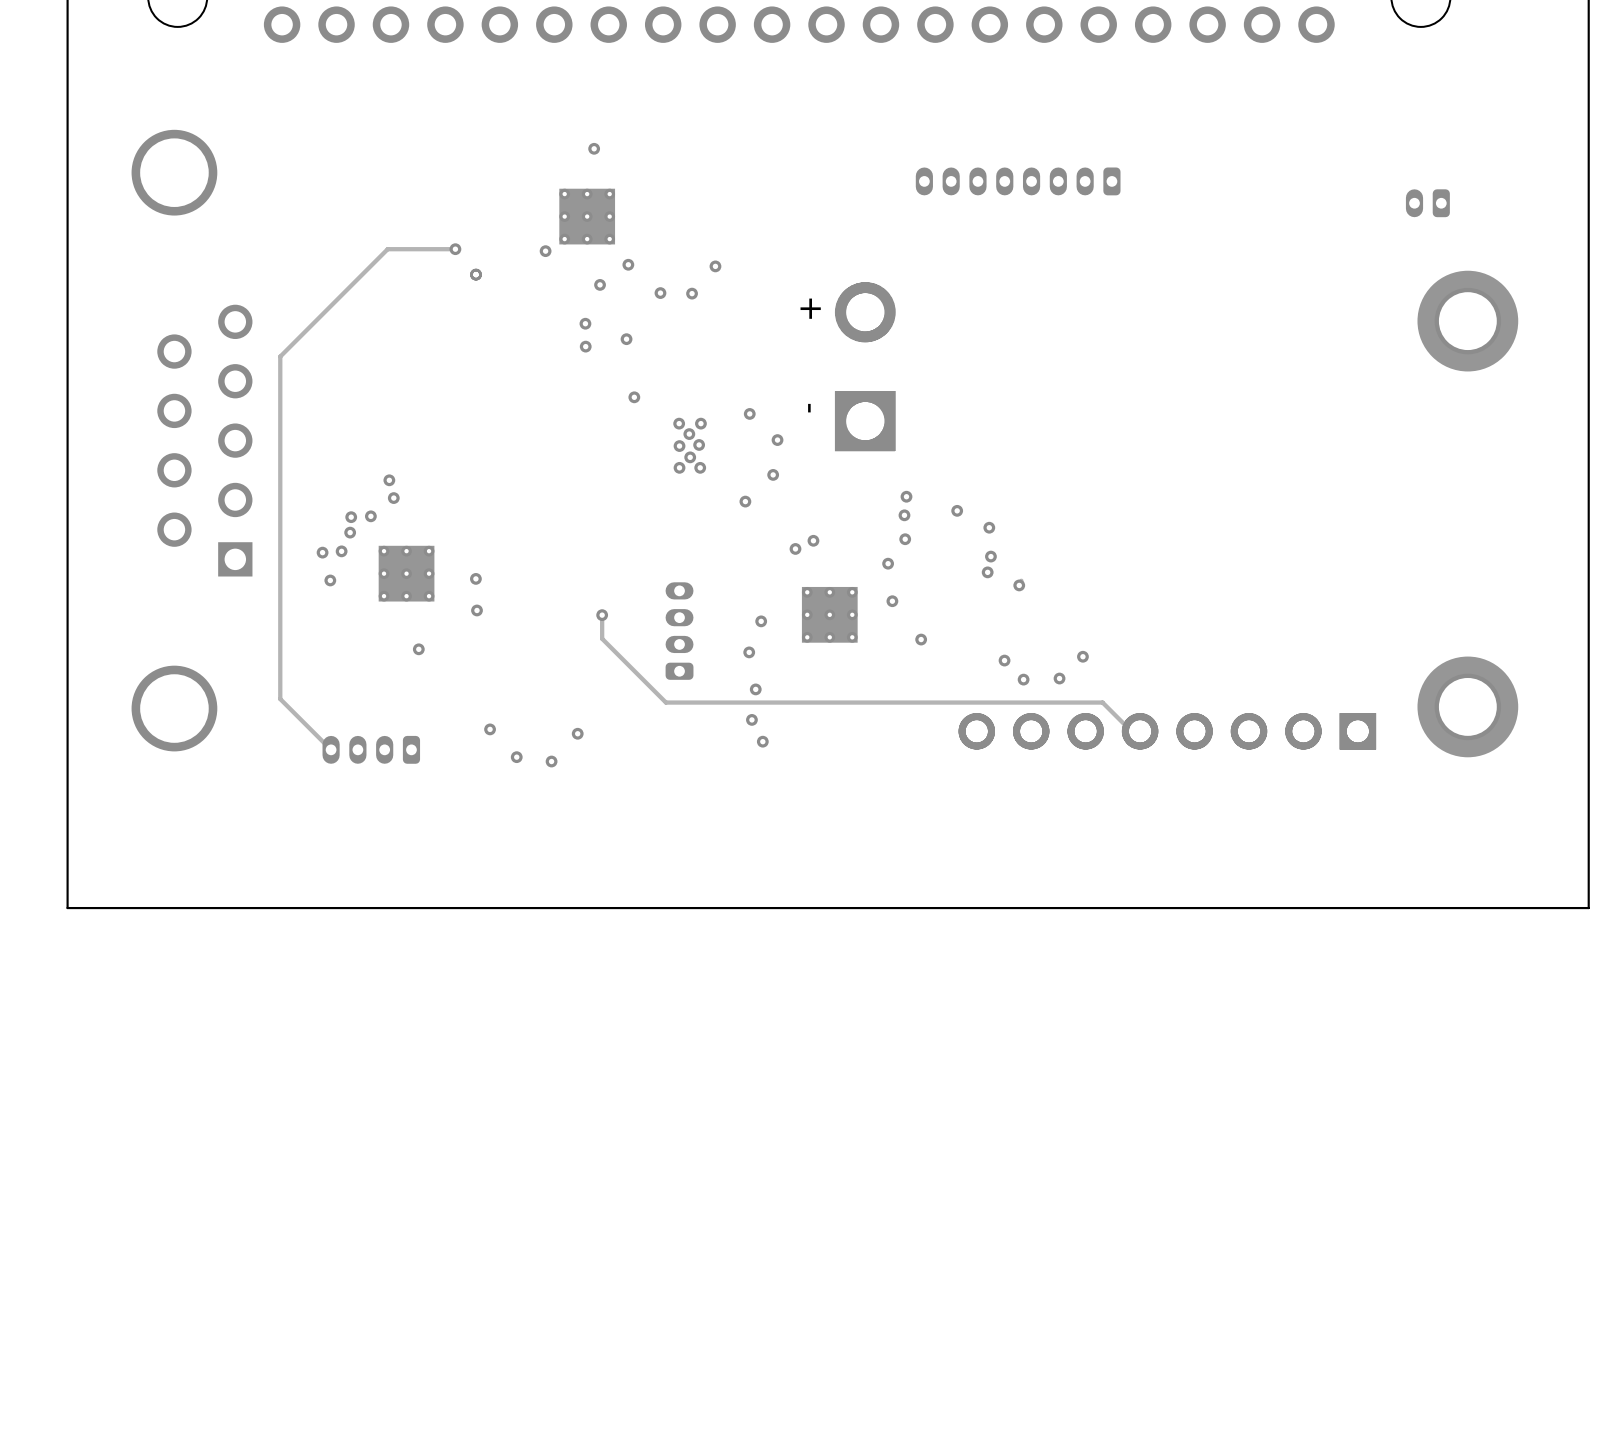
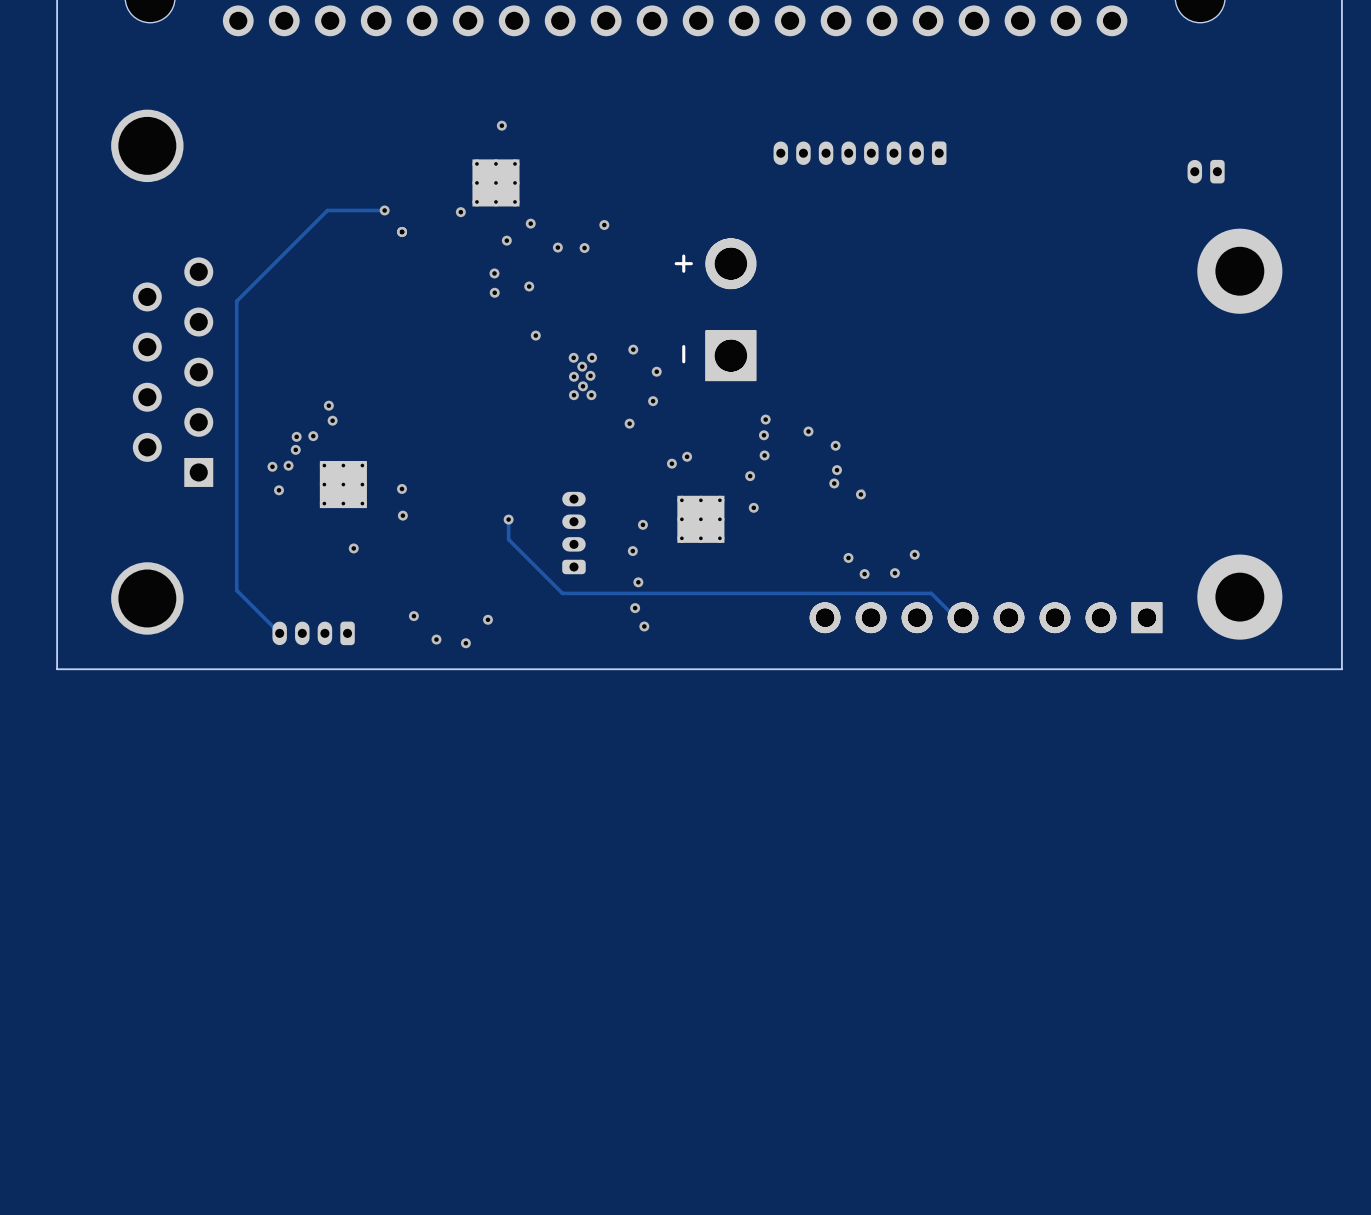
via: (921, 639) -> none
board edge: (1588, 792) (1588, 908) (67, 908) (67, 792) -> (1341, 669) (57, 669)

